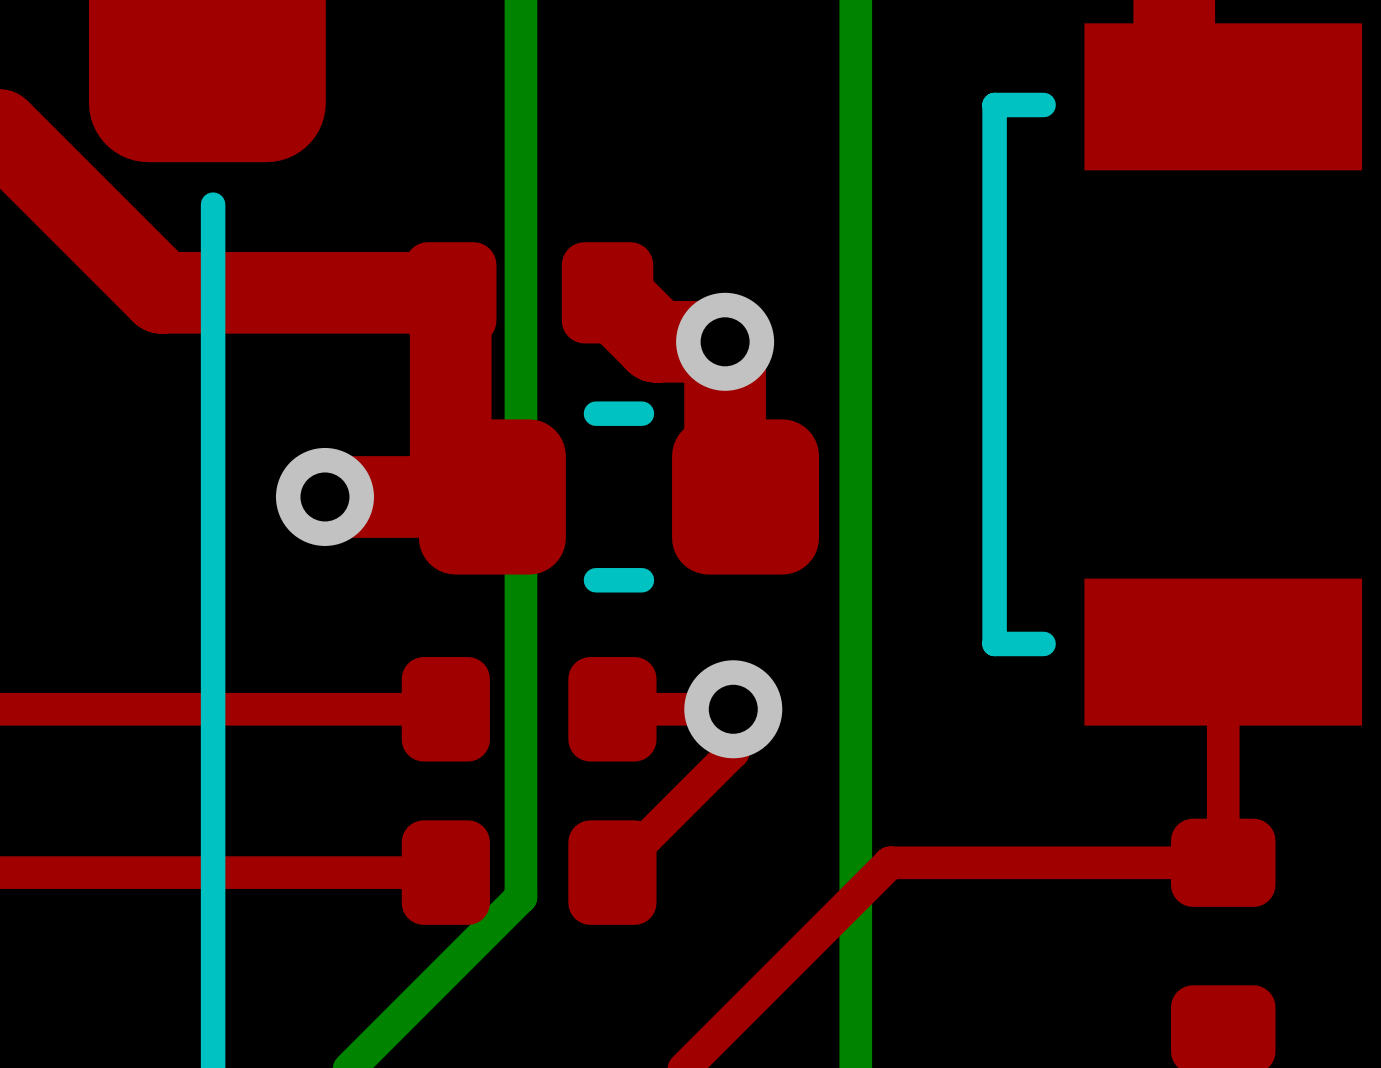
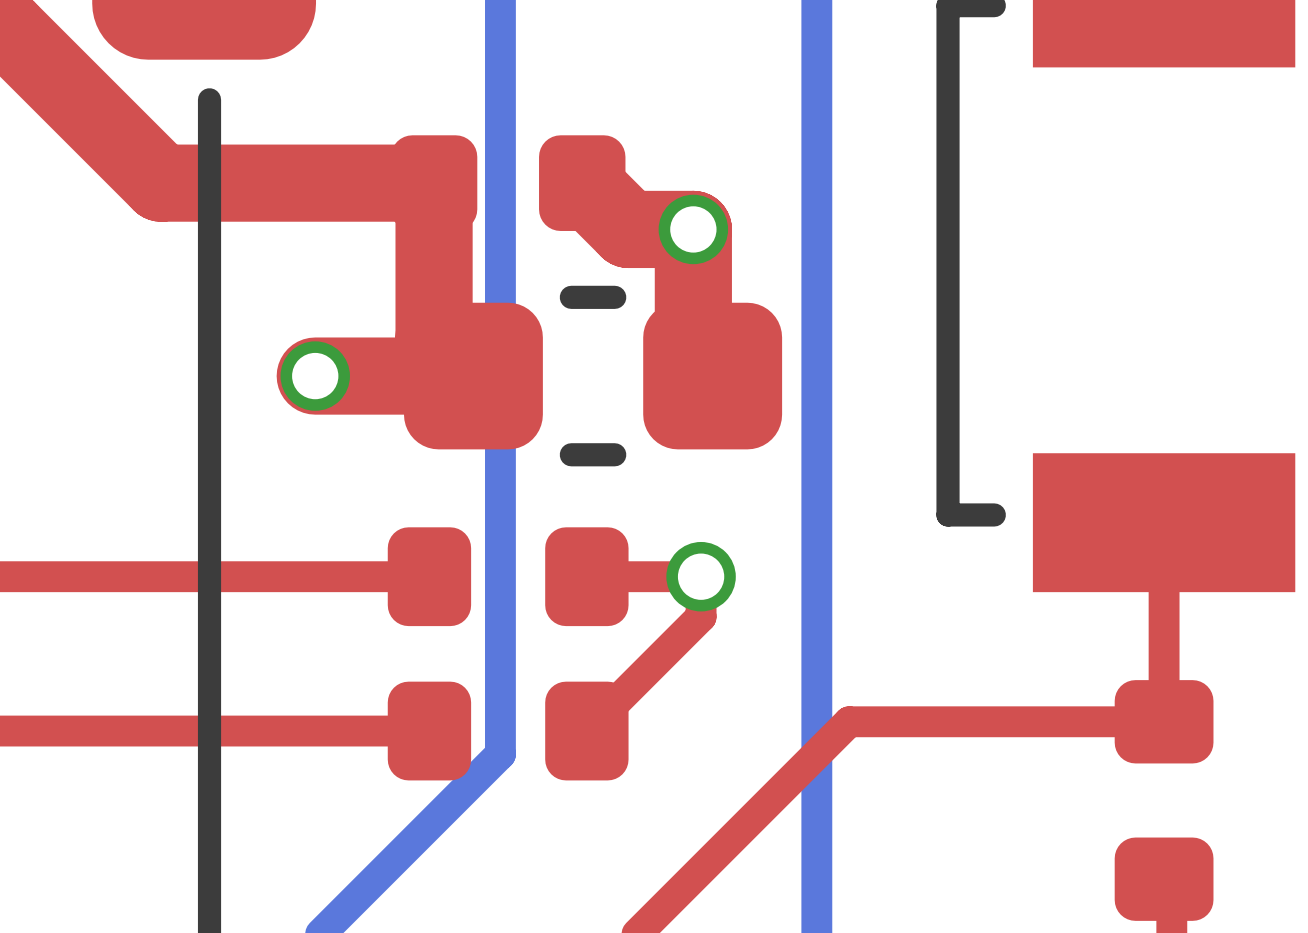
via size: [676, 292, 775, 391] -> [658, 194, 729, 265]
via size: [275, 447, 374, 546] -> [280, 341, 350, 411]
via size: [684, 660, 783, 759] -> [666, 541, 736, 612]

